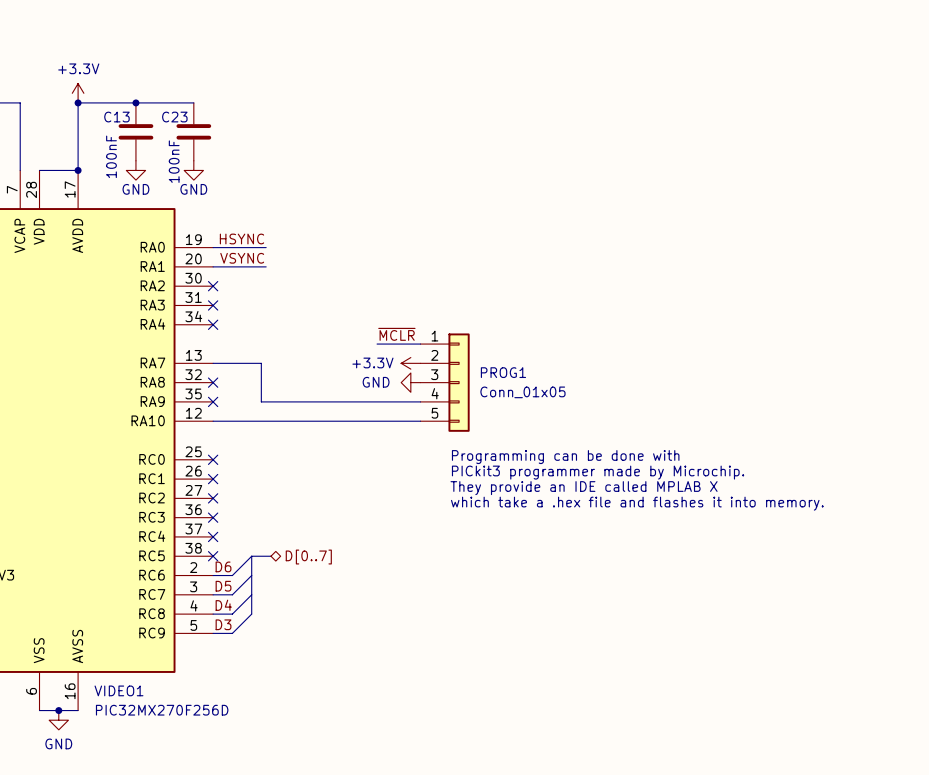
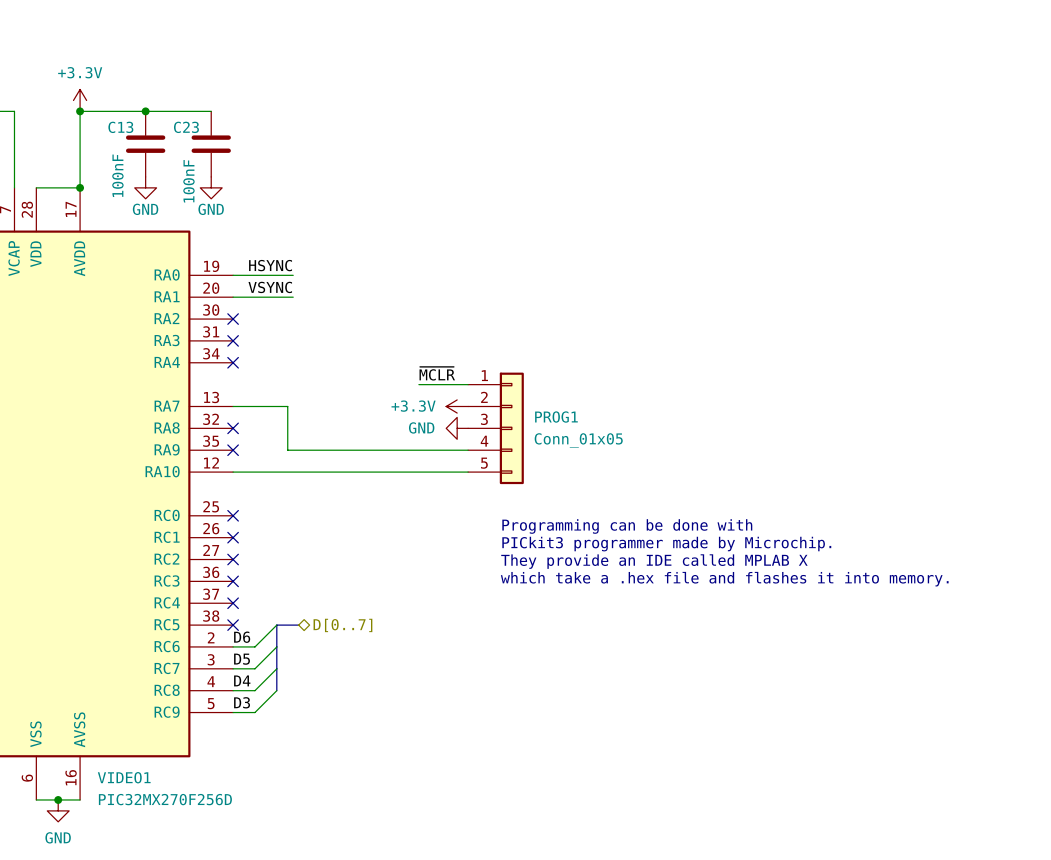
text: Programming can be done with (565, 457) -> none
text: PICkit3 programmer made by Microchip. (598, 472) -> Programming can be done with (627, 526)
text: They provide an IDE called MPLAB X (584, 488) -> PICkit3 programmer made by Microchip. (666, 544)
text: which take a .hex file and flashes it into memory. (637, 503) -> They provide an IDE called MPLAB X (654, 561)
text: none -> which take a .hex file and flashes it into memory. (724, 579)

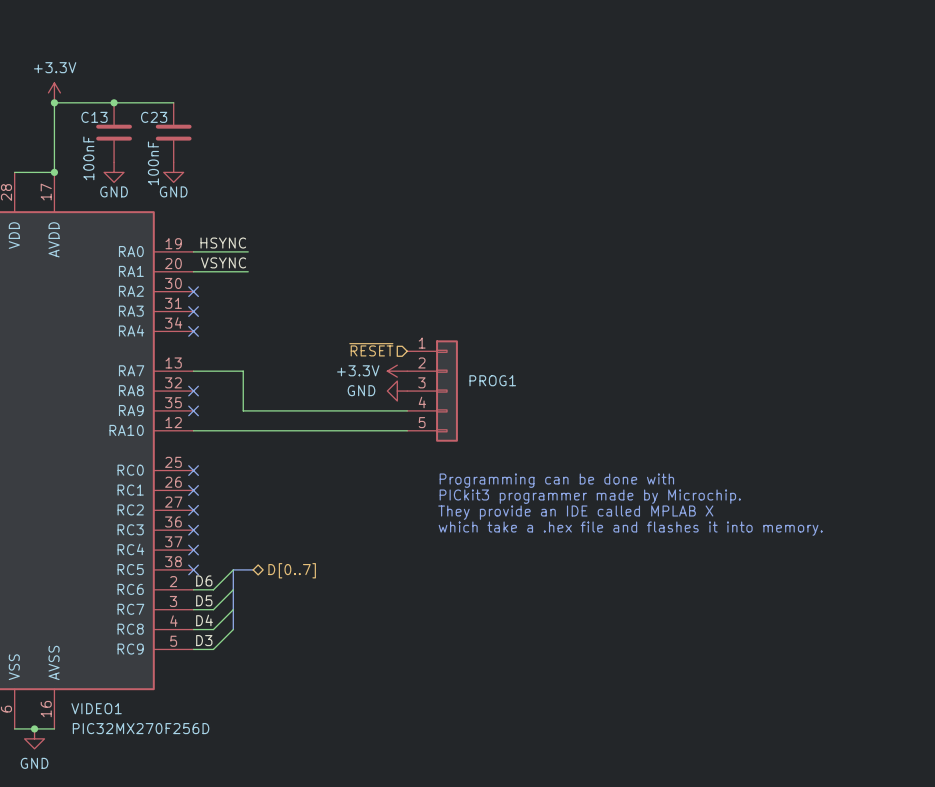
label: ~{MCLR} (437, 373) -> none
hierarchical label: none -> ~{RESET} (371, 349)
wire: (418, 384) (468, 384) -> none
PROG1 value: Conn_01x05 (578, 440) -> none

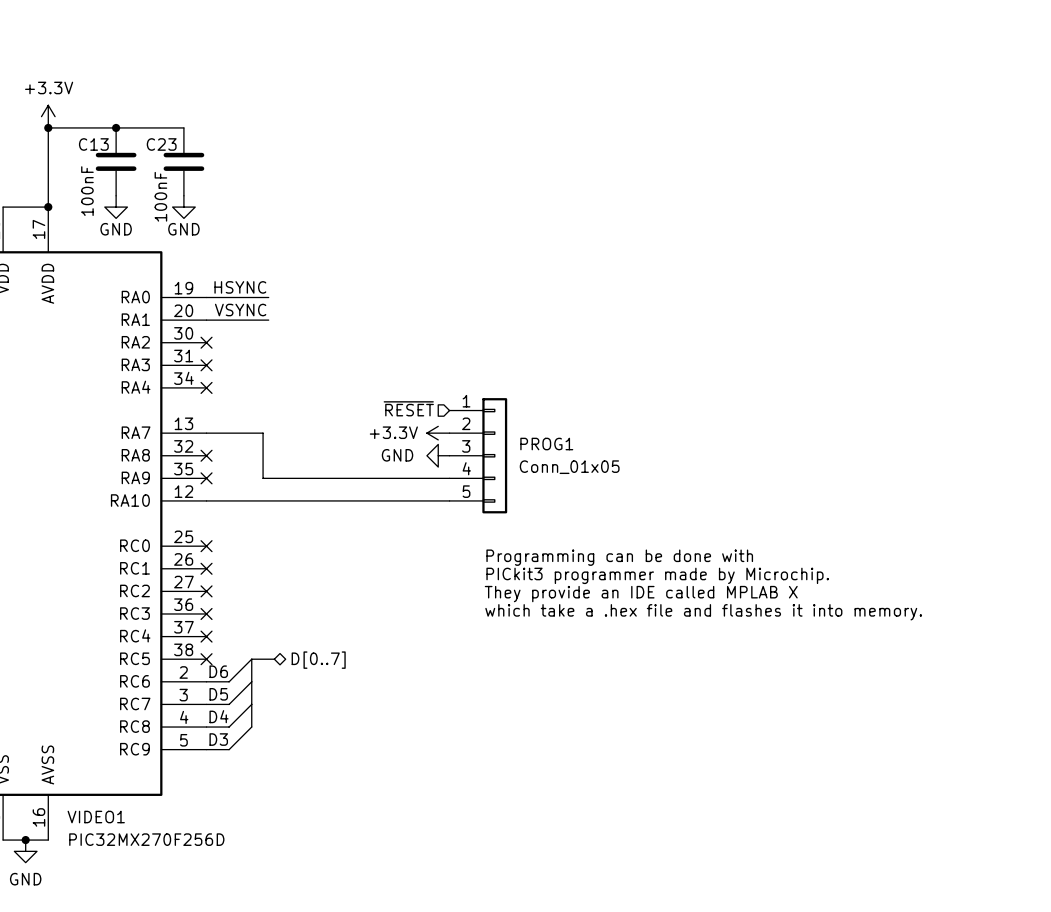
PROG1 value: none -> Conn_01x05 (569, 467)

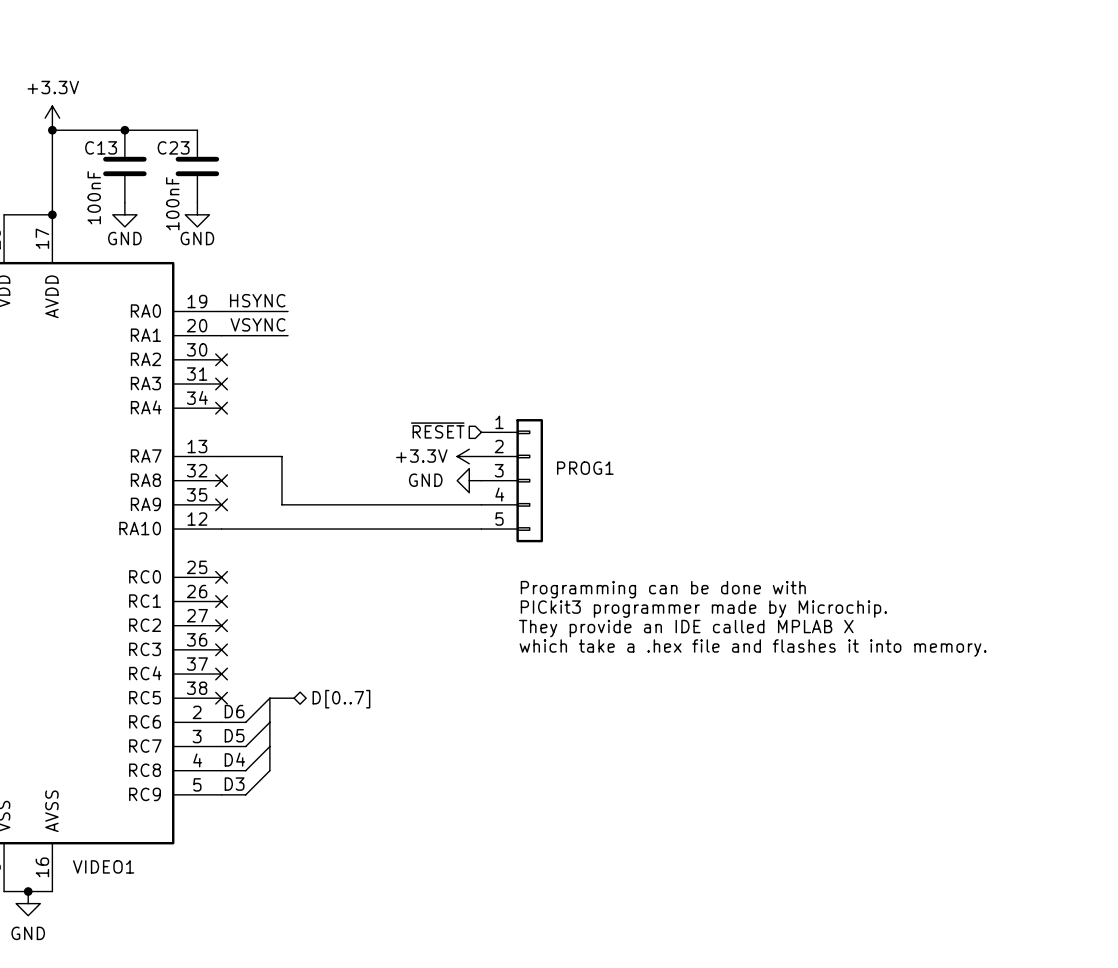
PROG1 value: Conn_01x05 (569, 467) -> none
VIDEO1 value: PIC32MX270F256D (146, 839) -> none

